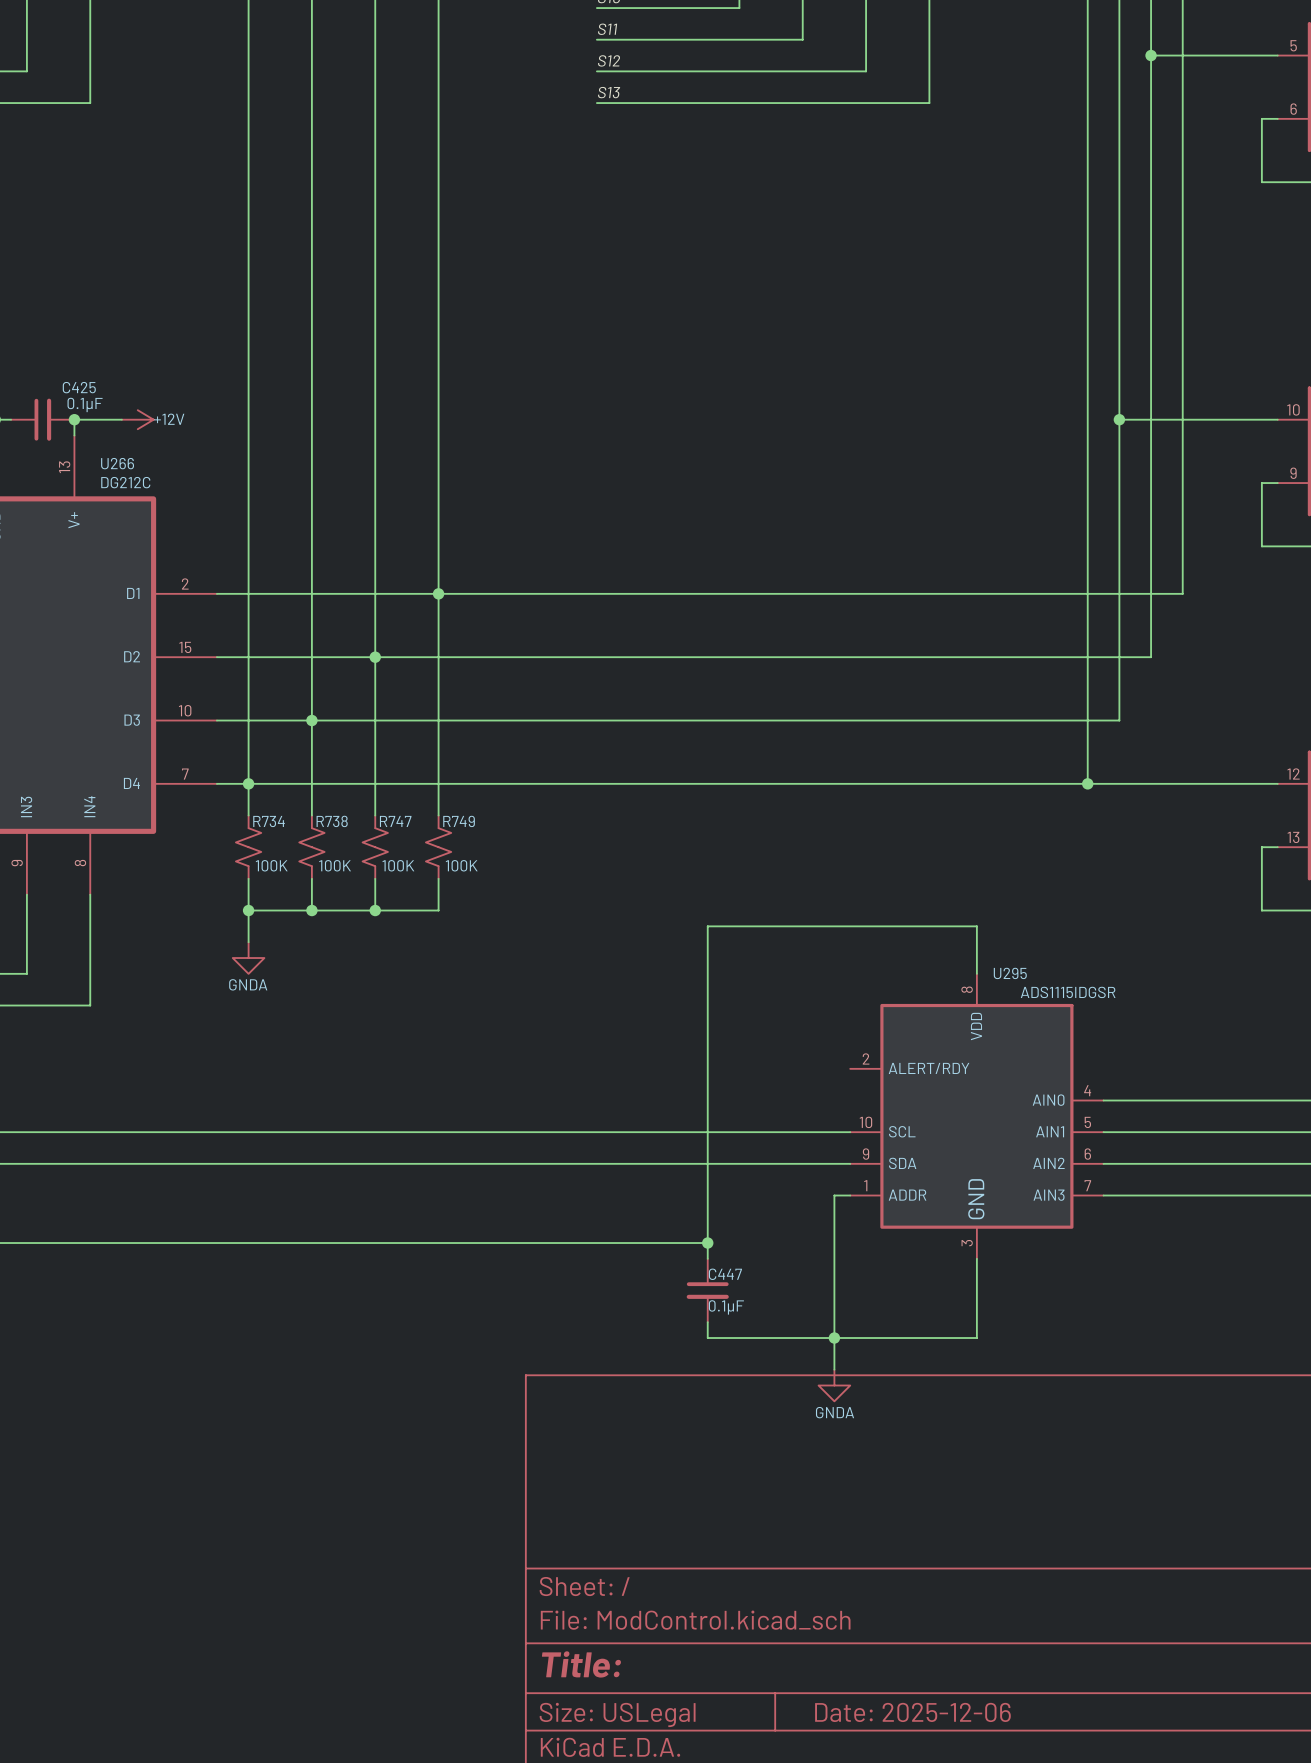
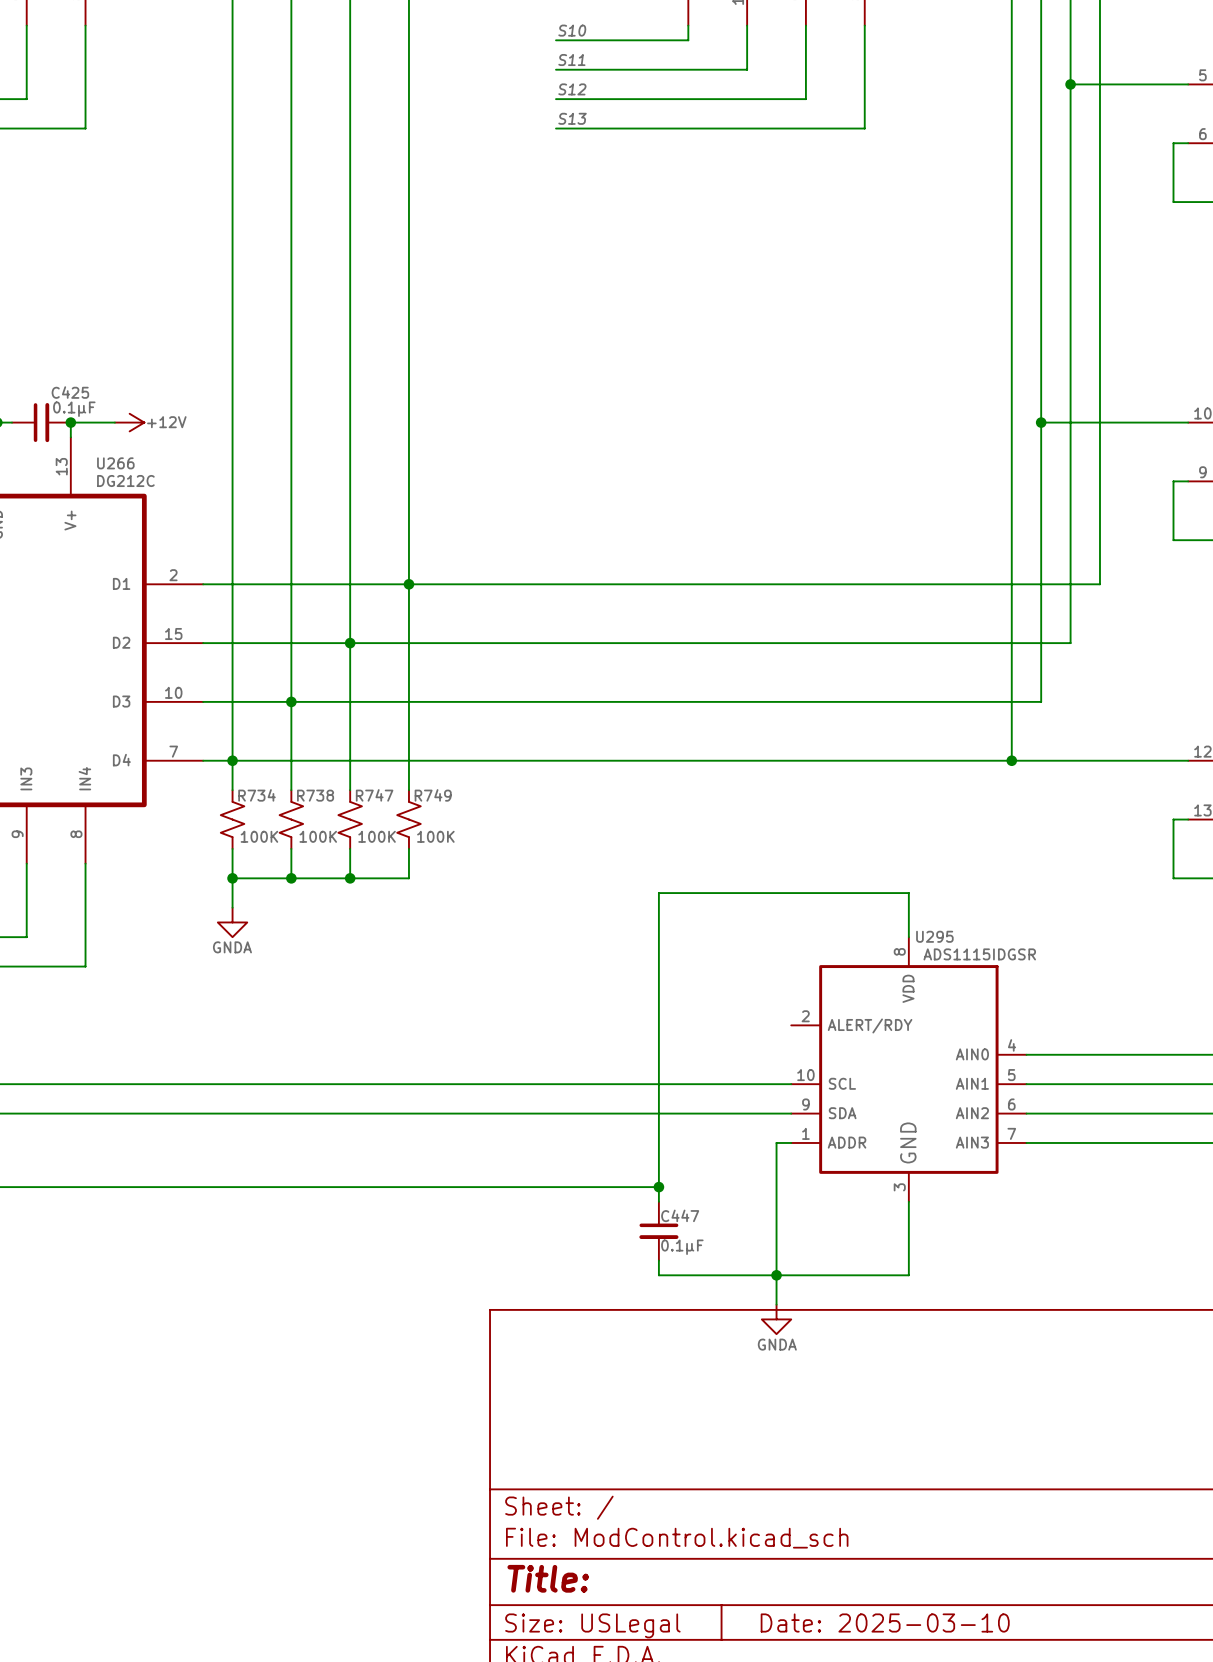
title block: Date: 2025-12-06 (912, 1712) -> Date: 2025-03-10 (885, 1623)

